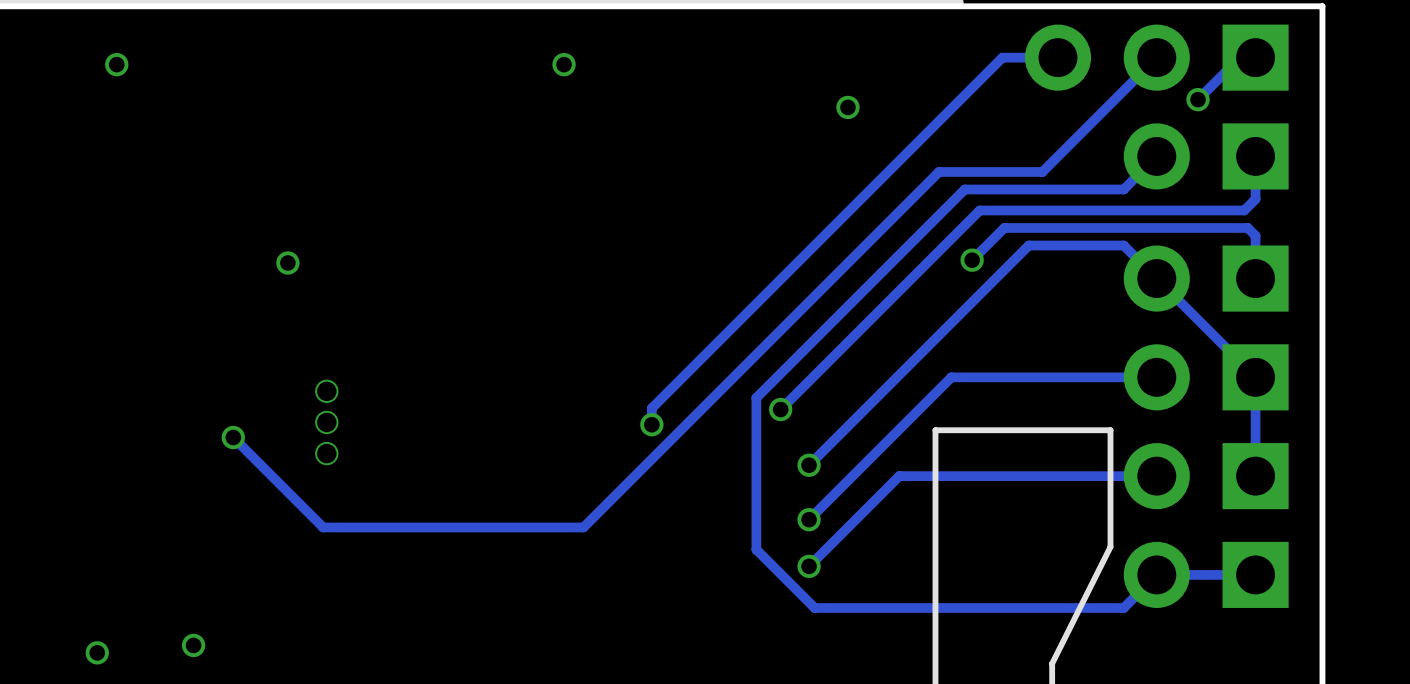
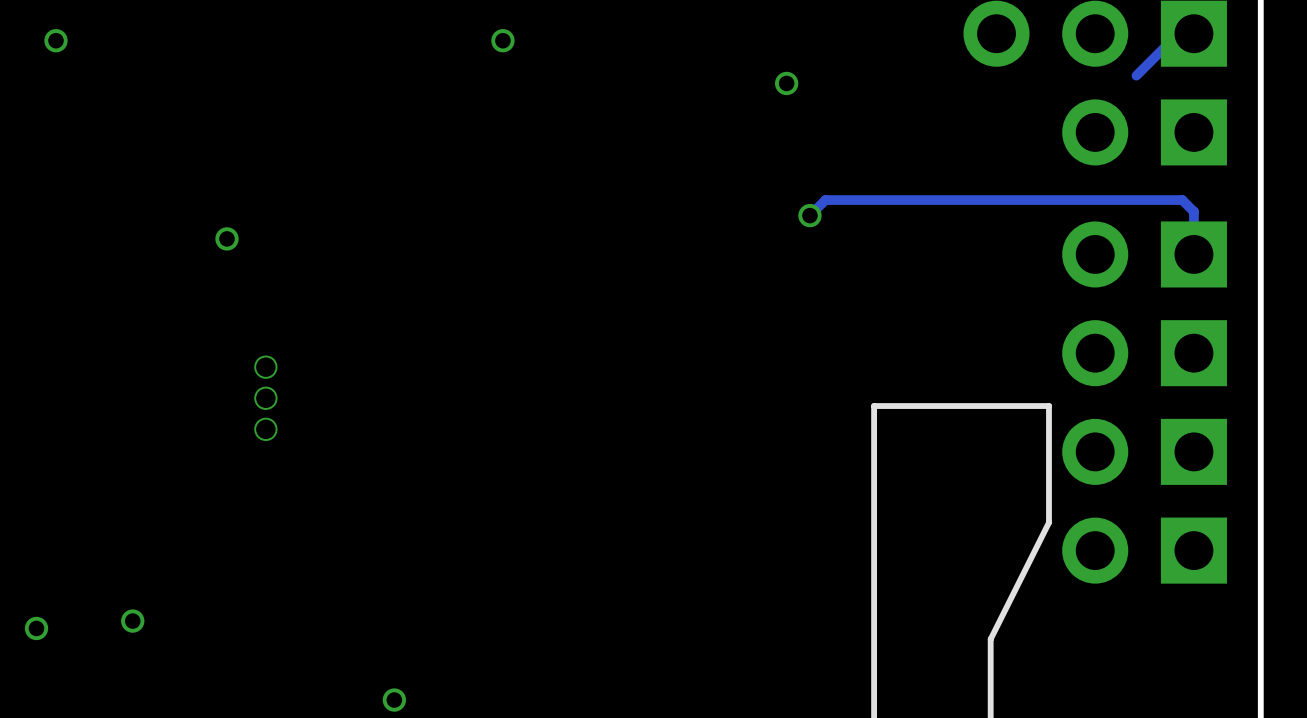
track: (1057, 57) (1002, 57) (651, 408) (651, 424) -> none
track: (1156, 57) (1042, 171) (938, 171) (886, 224) -> none
via: (1198, 99) -> none
track: (1156, 156) (1123, 189) (964, 189) (756, 397) (756, 549) (814, 607) (1123, 607) (1156, 574) (1255, 574) -> none
track: (1255, 156) (1255, 199) (1244, 210) (979, 210) (780, 409) -> none
track: (1247, 227) (1004, 227) (972, 260) -> (1186, 203) (1182, 200) (825, 200)
track: (871, 239) (583, 527) (323, 527) (233, 437) -> none
via: none -> (809, 215)
via: (972, 260) -> none
track: (1156, 377) (951, 377) (809, 519) -> none
via: (780, 409) -> none
via: (651, 424) -> none
via: (233, 437) -> none
track: (809, 465) (1028, 245) (1123, 245) (1255, 377) (1255, 476) -> none
via: (809, 465) -> none
track: (1156, 476) (899, 476) (809, 566) -> none
via: (809, 519) -> none
via: (809, 566) -> none

